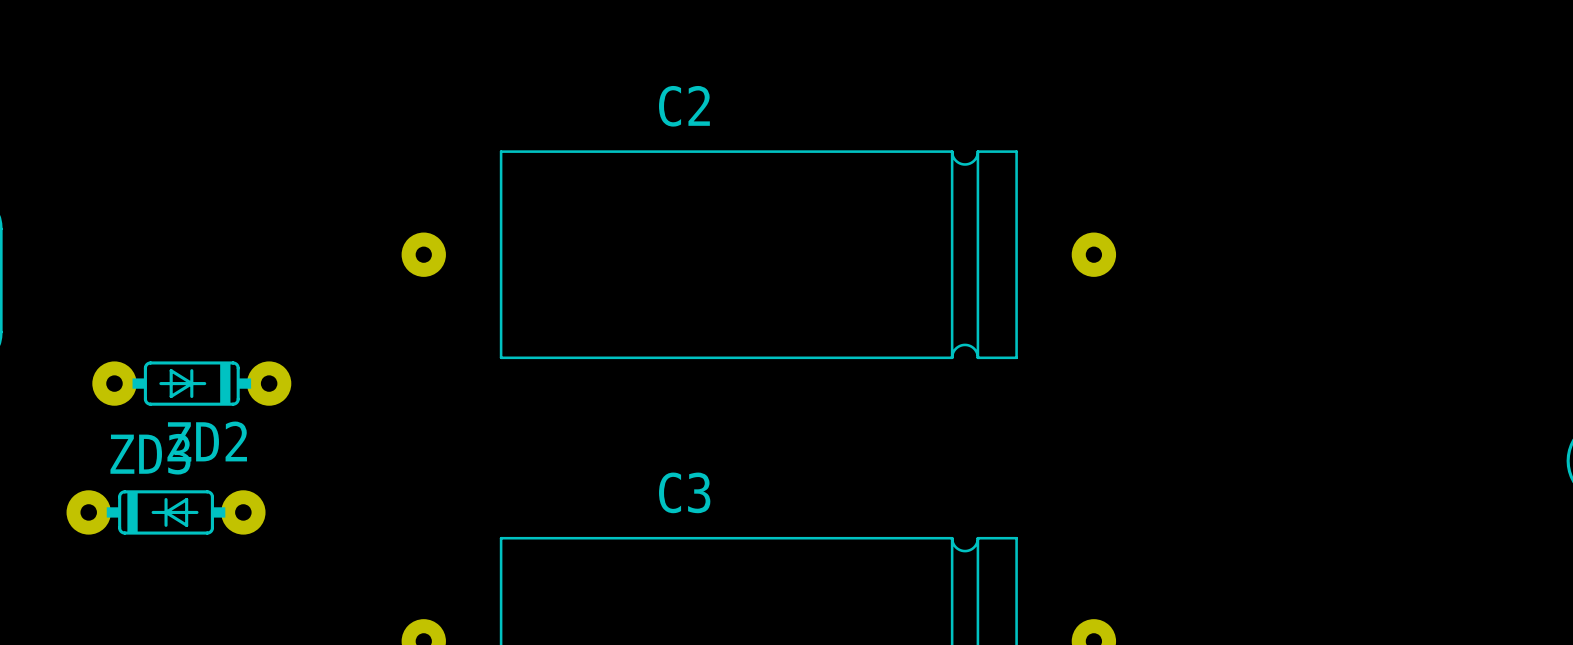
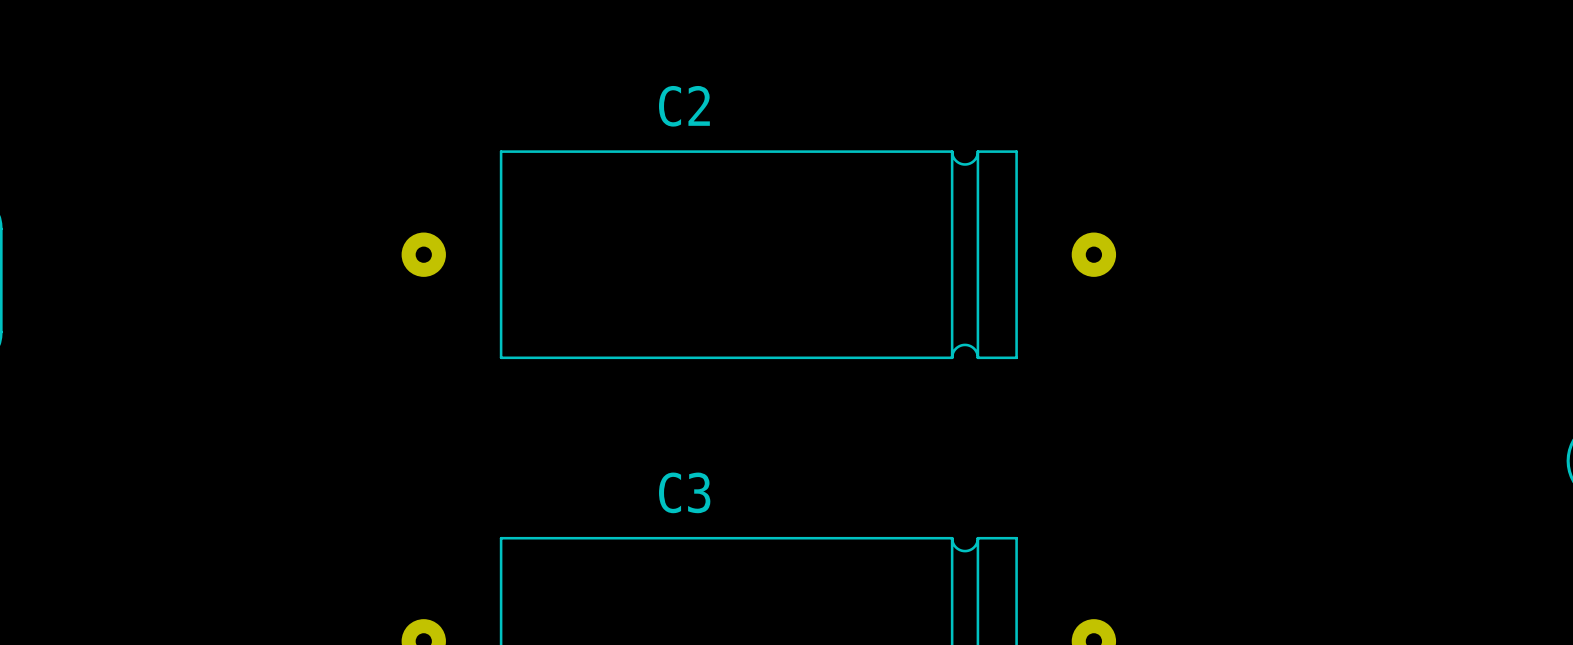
ZD2: (191, 383) -> none
ZD3: (166, 512) -> none

